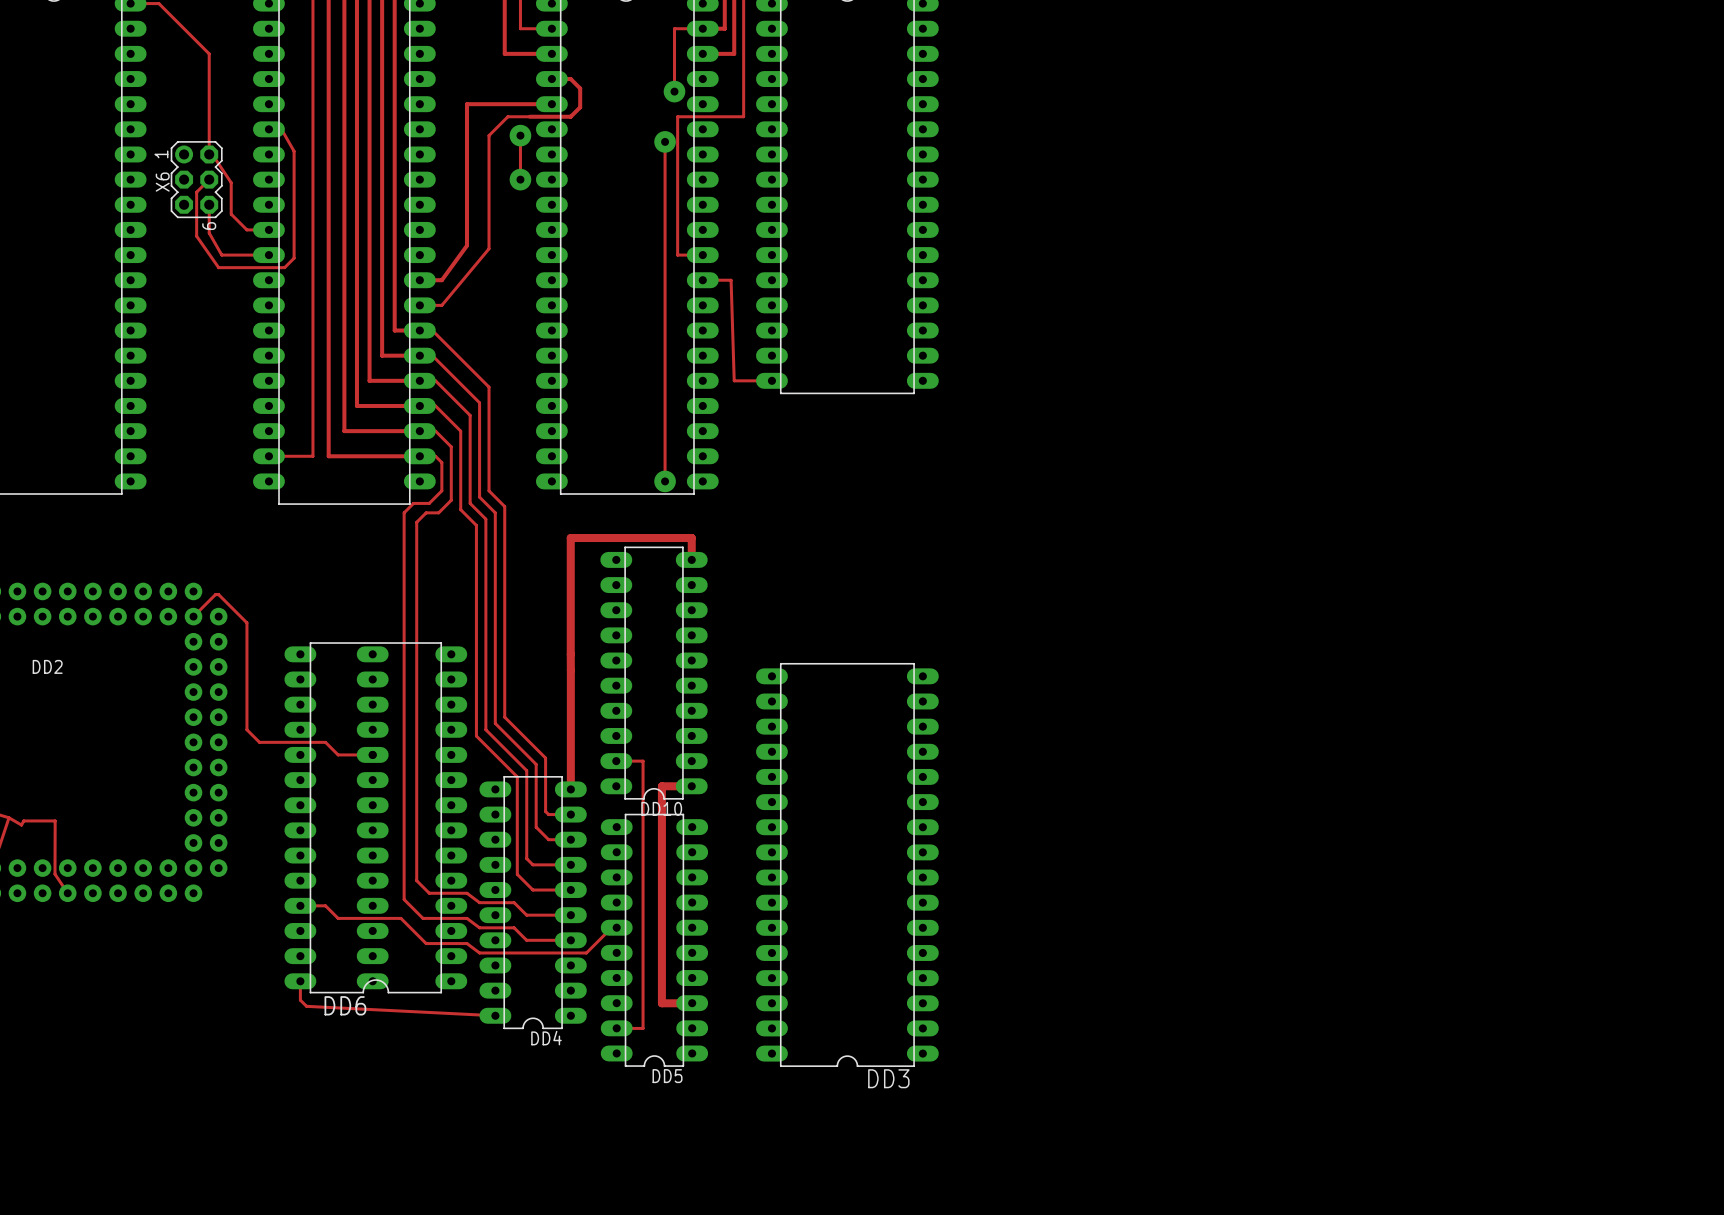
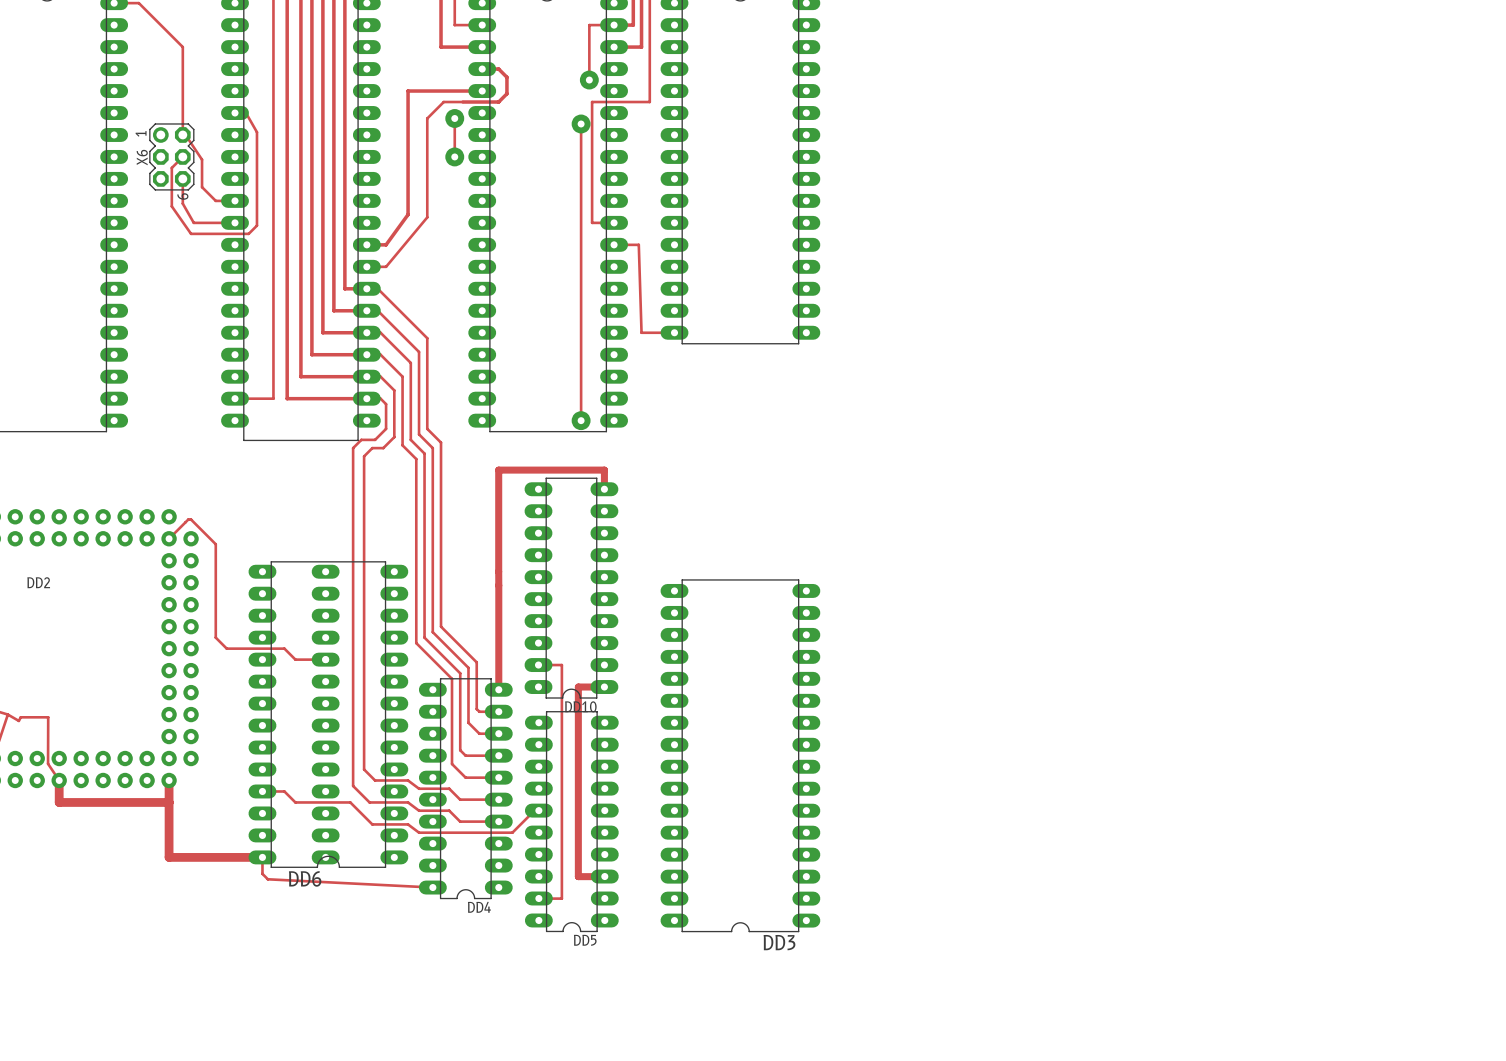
track: none -> (59, 780) (59, 802) (169, 802)
track: none -> (169, 780) (169, 857) (262, 857)

